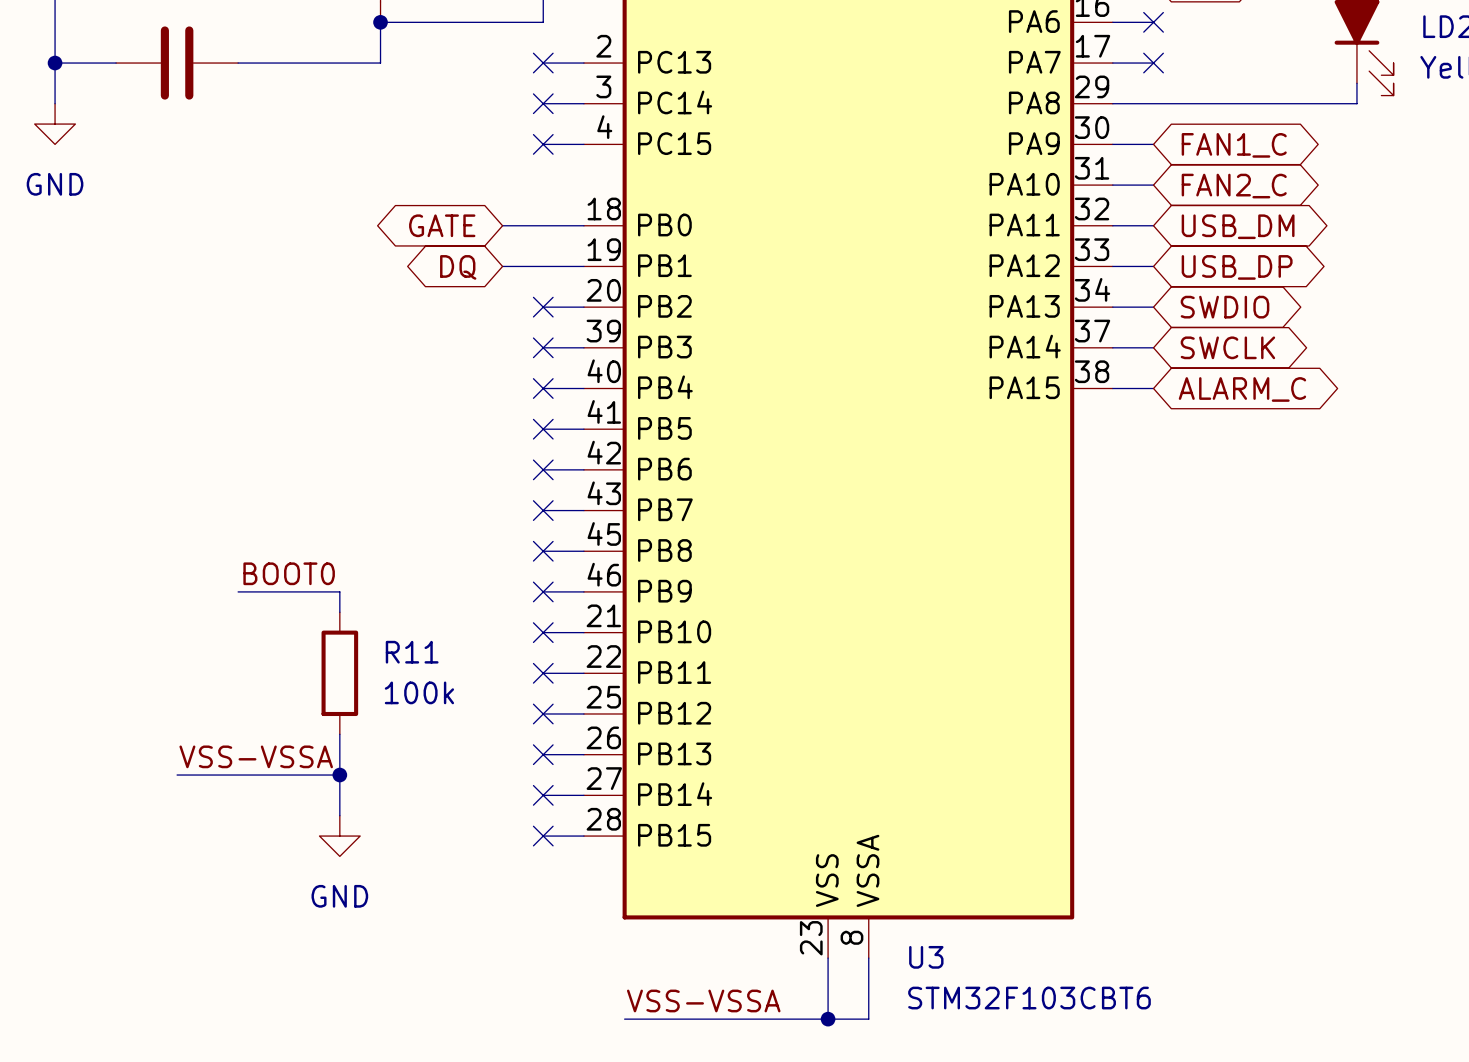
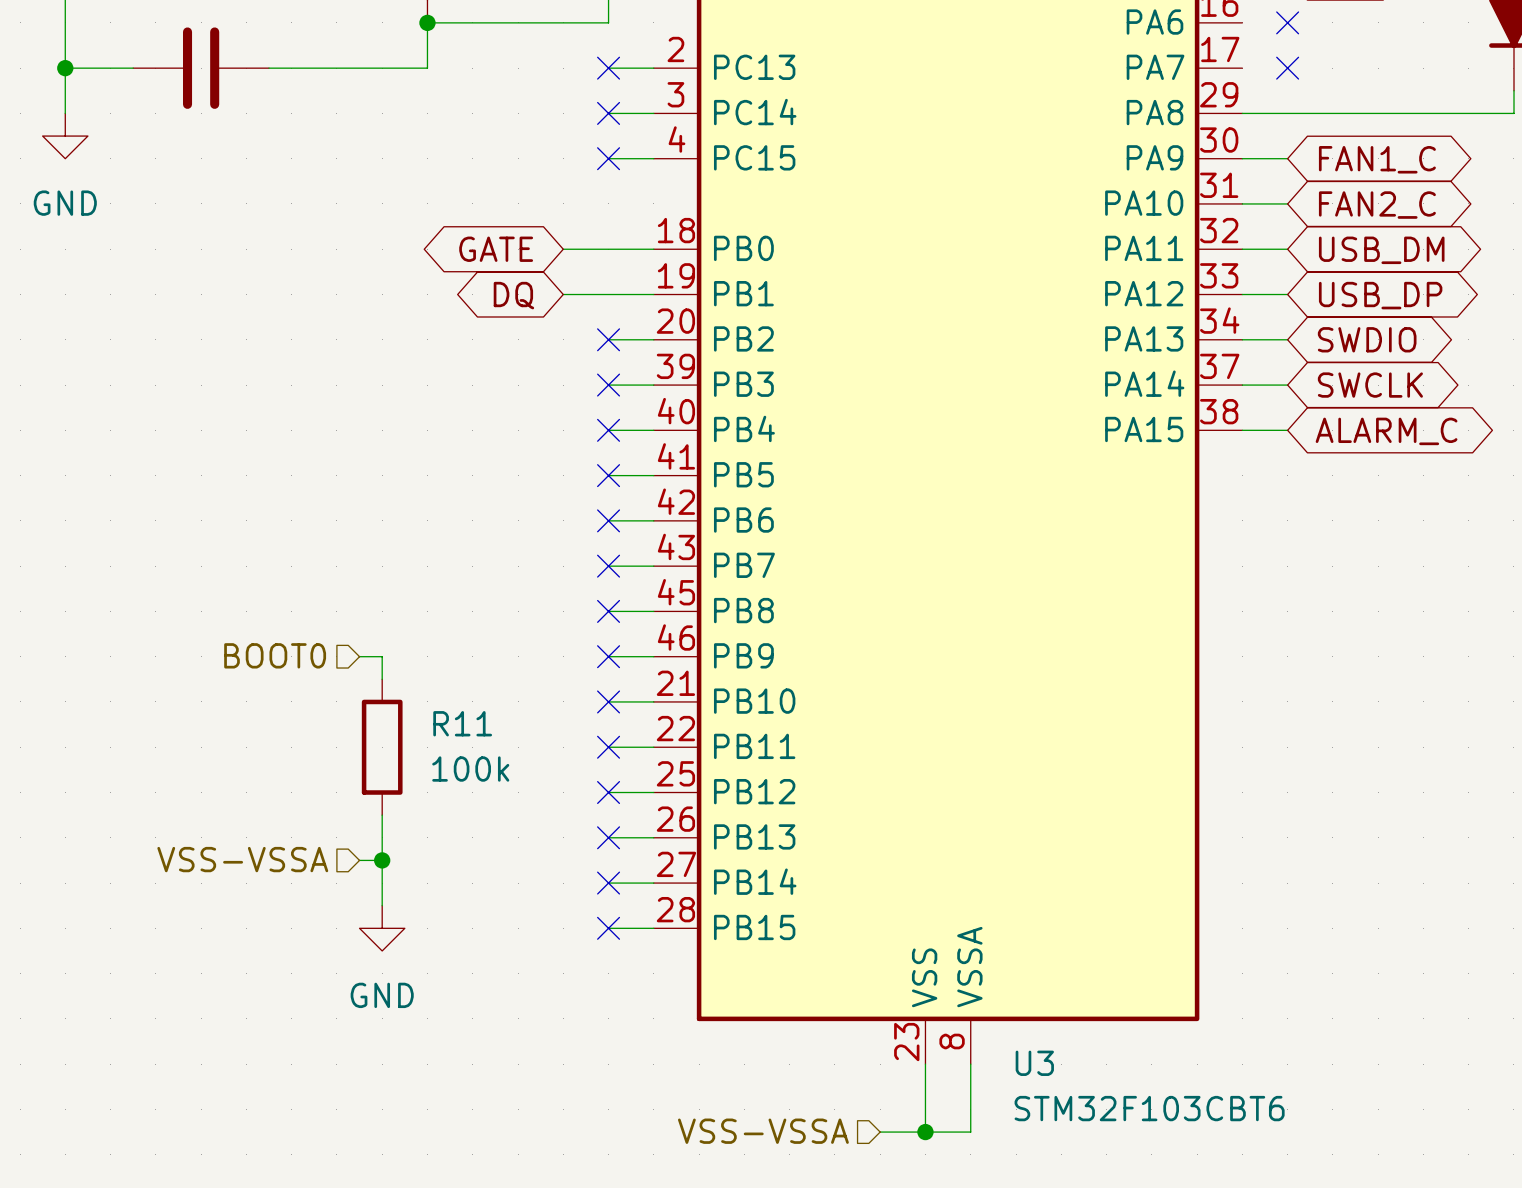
wire: (1112, 22) (1153, 22) -> none
wire: (1112, 63) (1153, 63) -> none
label: BOOT0 (289, 573) -> none
wire: (238, 591) (319, 591) -> none
hierarchical label: none -> BOOT0 (275, 655)
label: VSS-VSSA (256, 756) -> none
hierarchical label: none -> VSS-VSSA (242, 859)
wire: (177, 775) (319, 775) -> none
label: VSS-VSSA (703, 1000) -> none
hierarchical label: none -> VSS-VSSA (763, 1131)
wire: (624, 1019) (787, 1019) -> none

